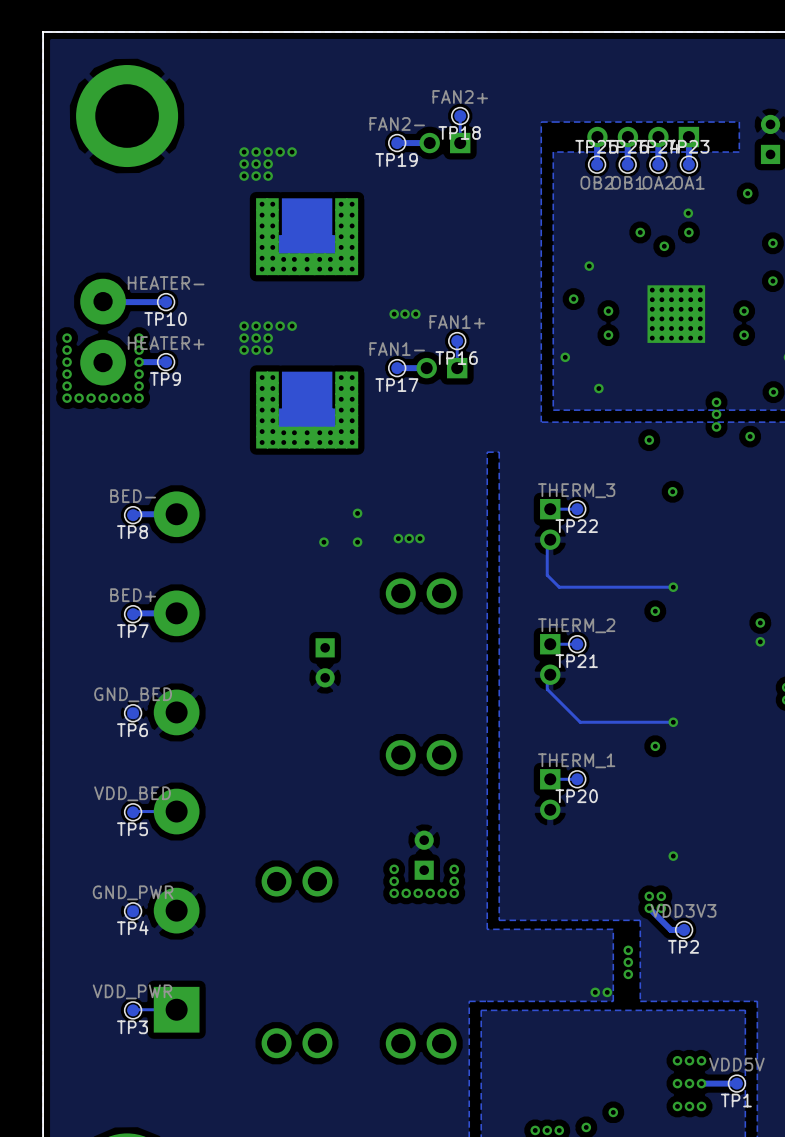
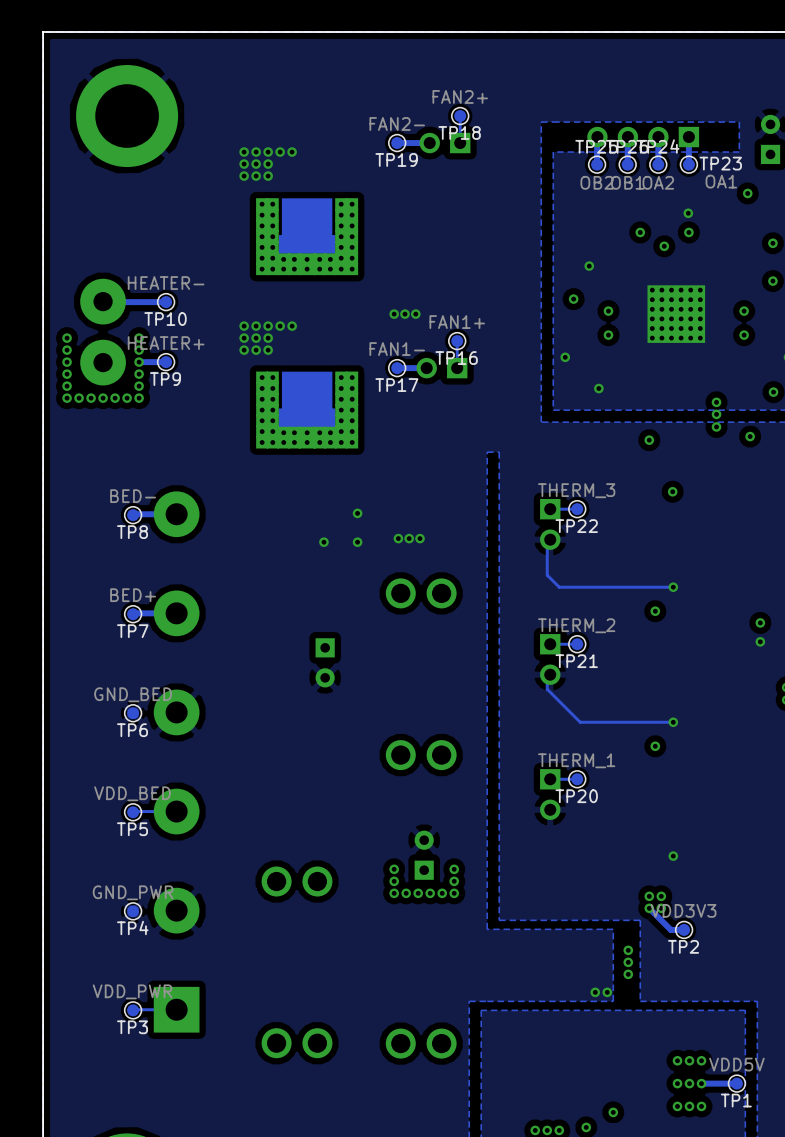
TP23 name position: TP23 (688, 146) -> TP23 (720, 163)
TP23 value position: OA1 (688, 182) -> OA1 (721, 181)

